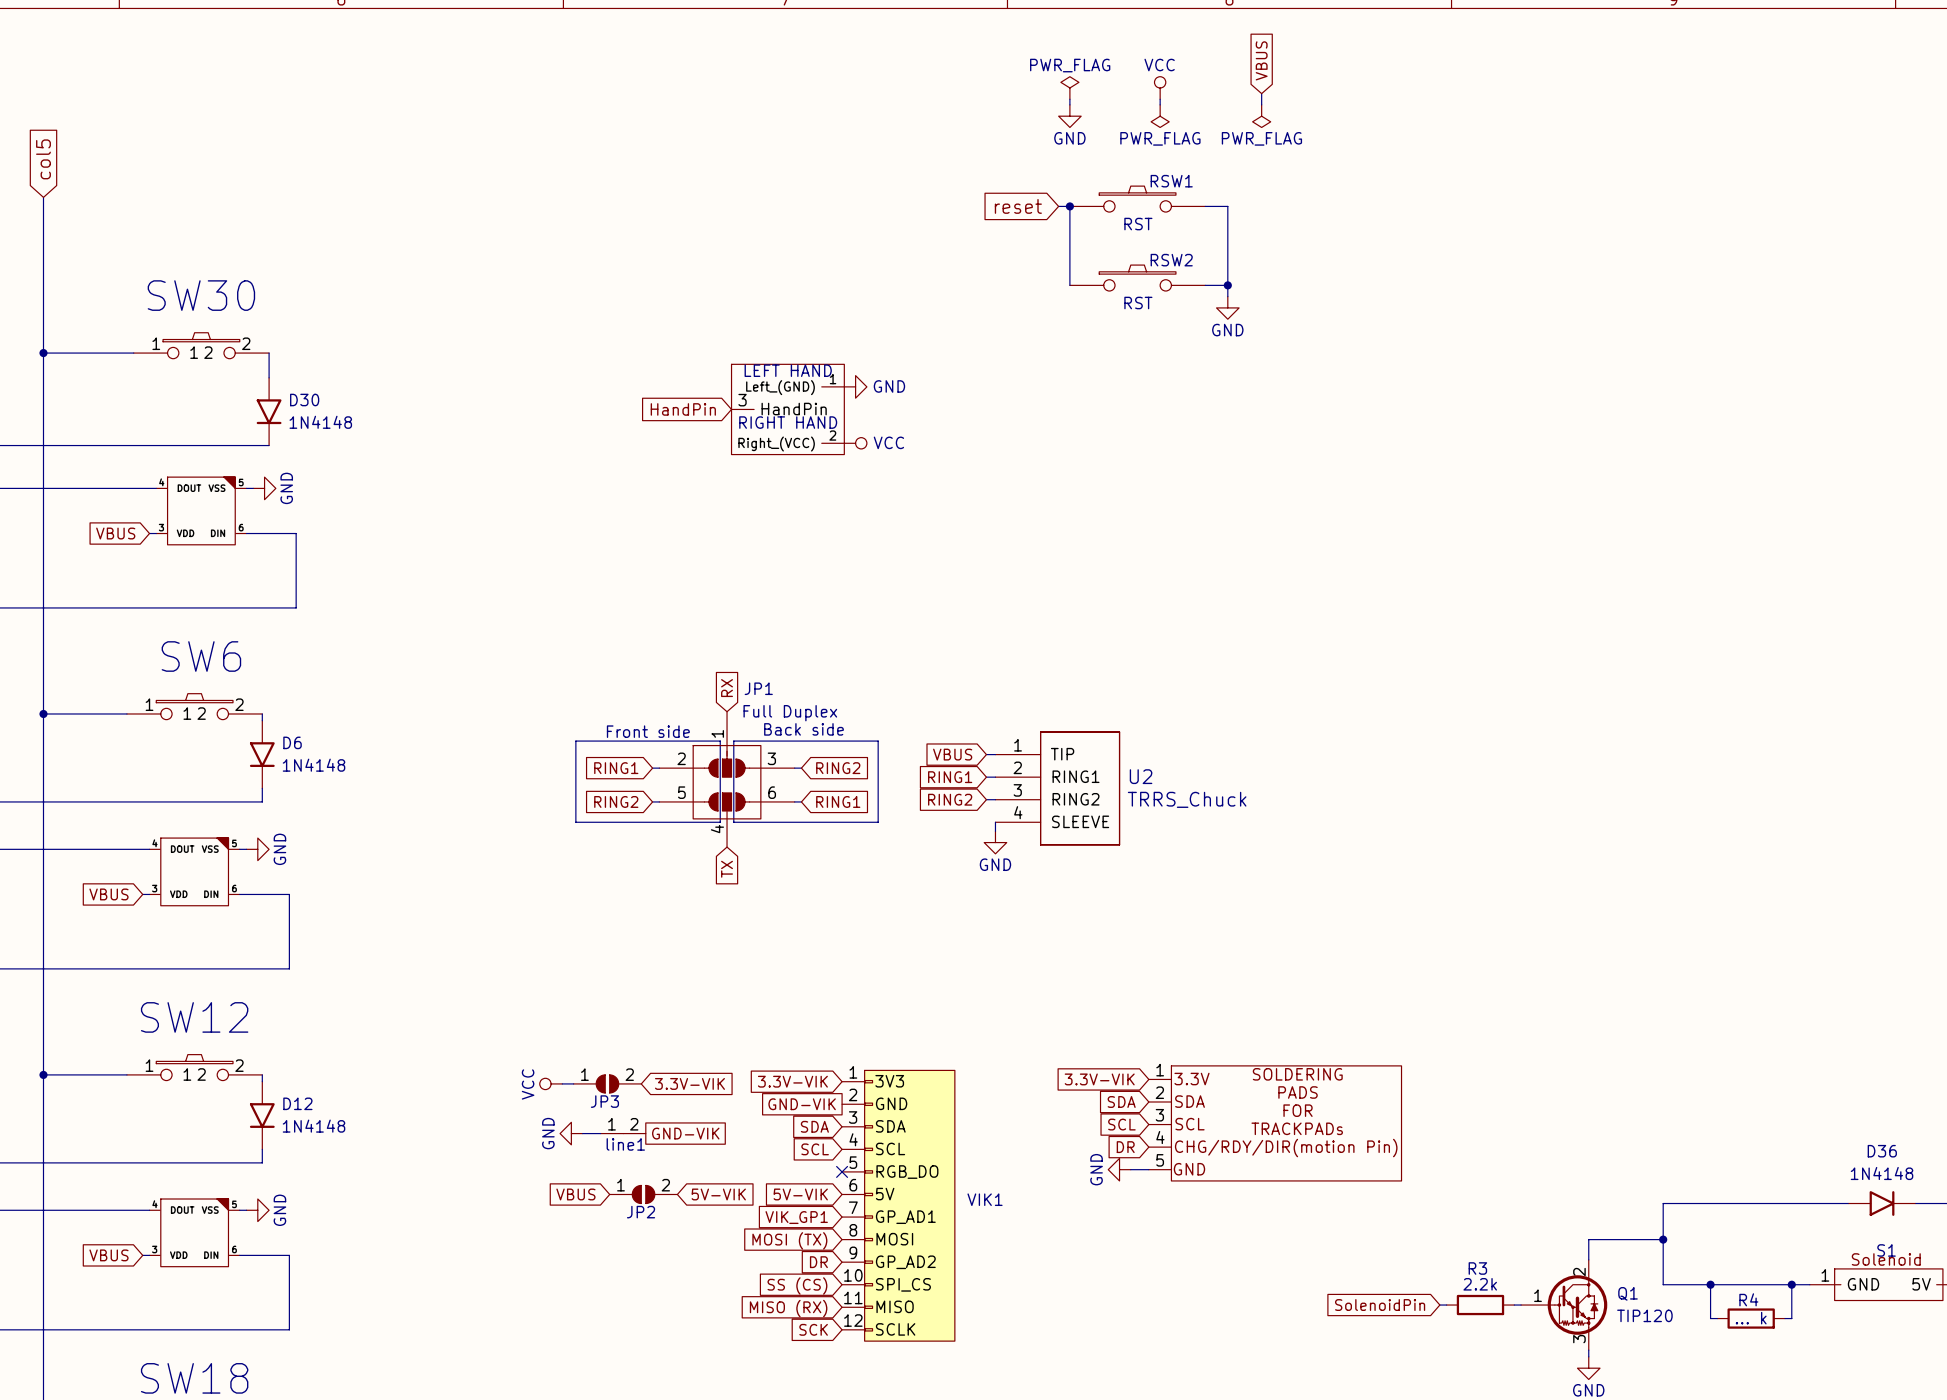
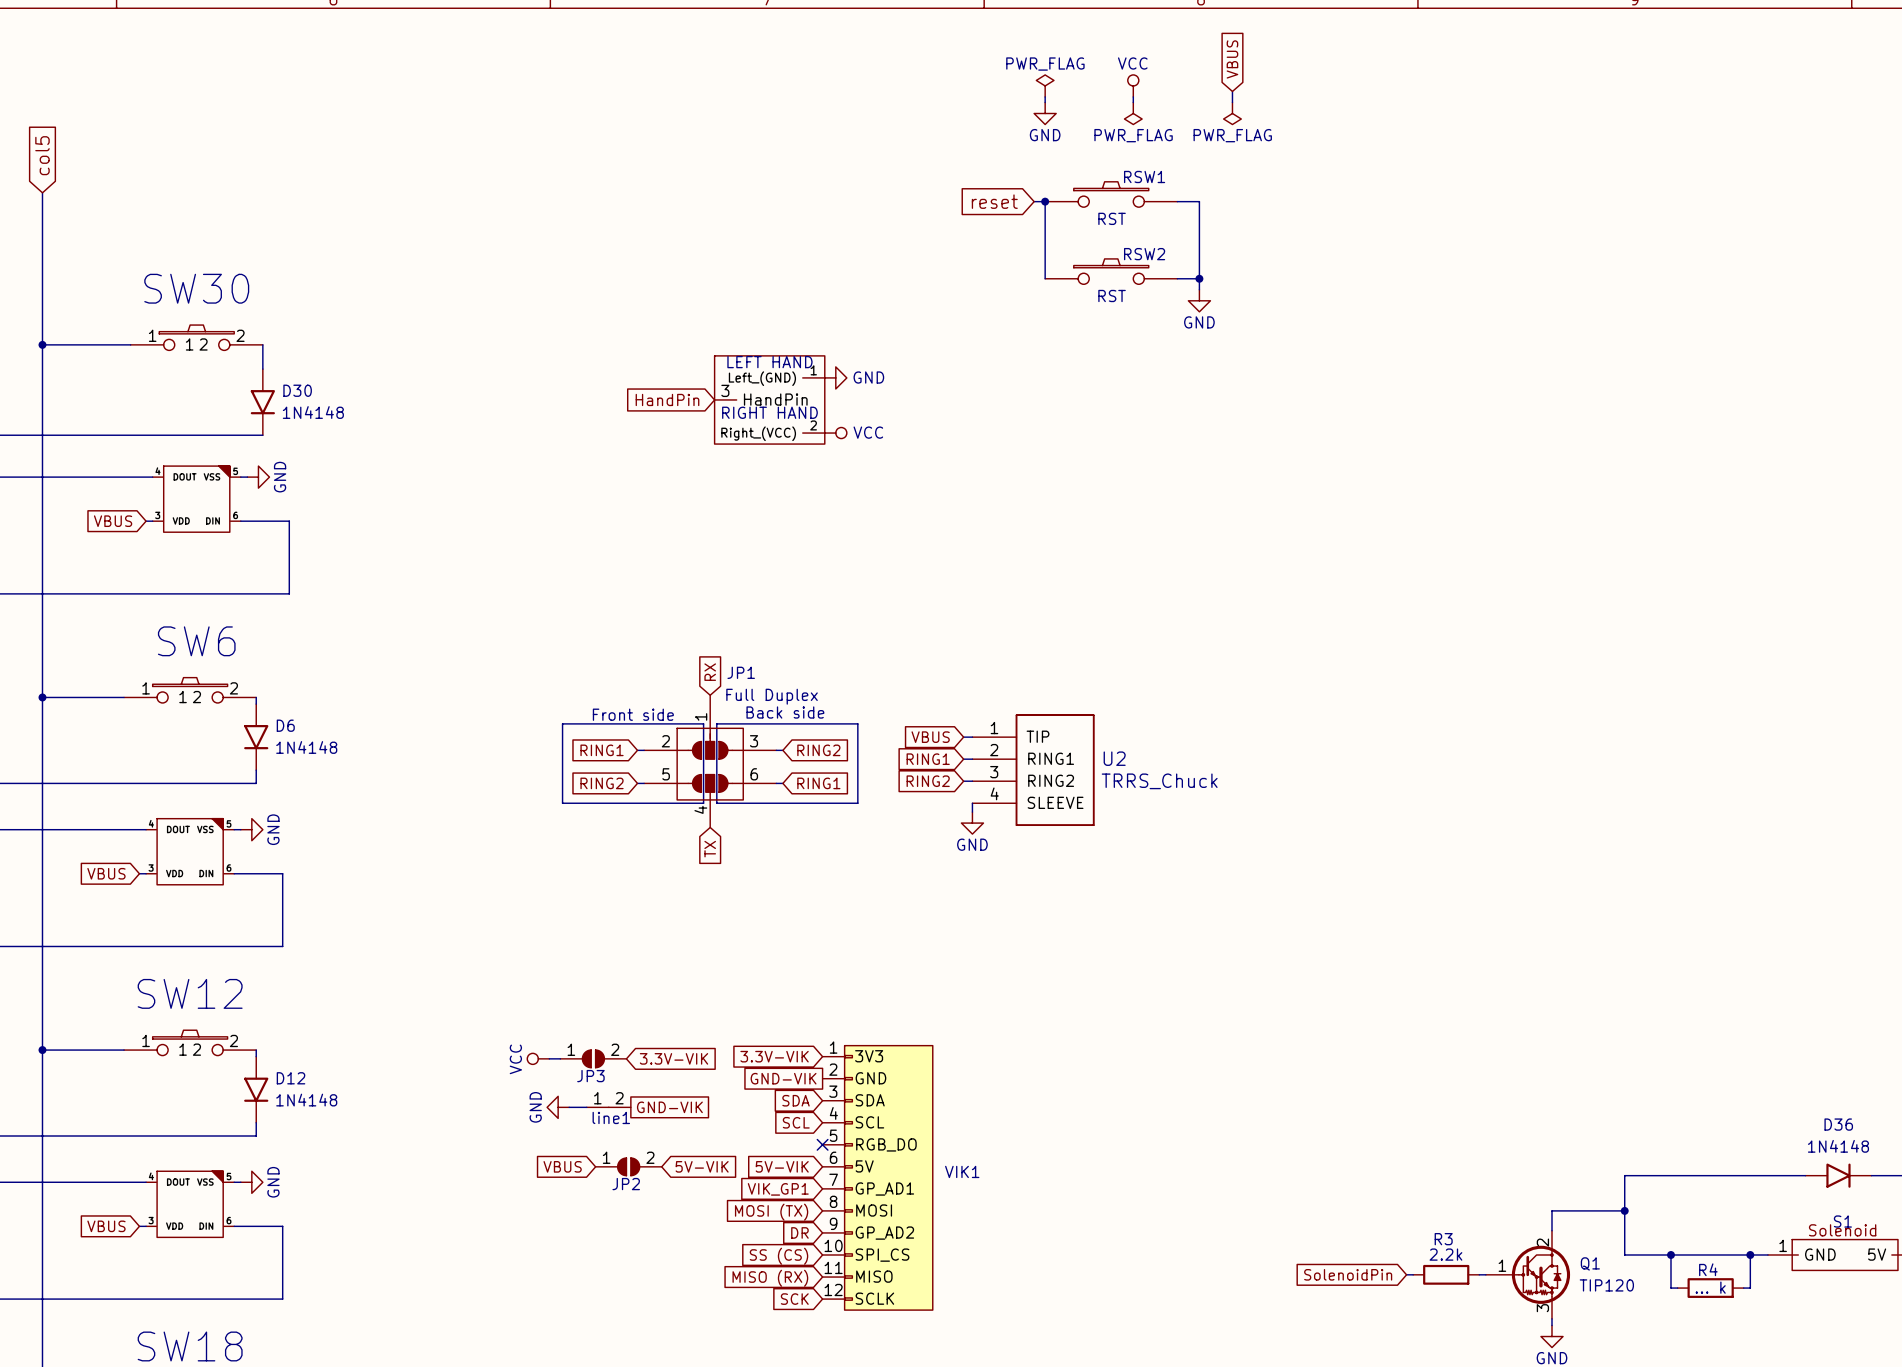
global label: 3.3V-VIK (1099, 1079) -> none
global label: SDA (1121, 1101) -> none
part: (1275, 1123) -> none
global label: SCL (1121, 1124) -> none
global label: DR (1125, 1147) -> none
power symbol: GND (1119, 1169) -> none
wire: (1130, 1169) (1148, 1169) -> none

